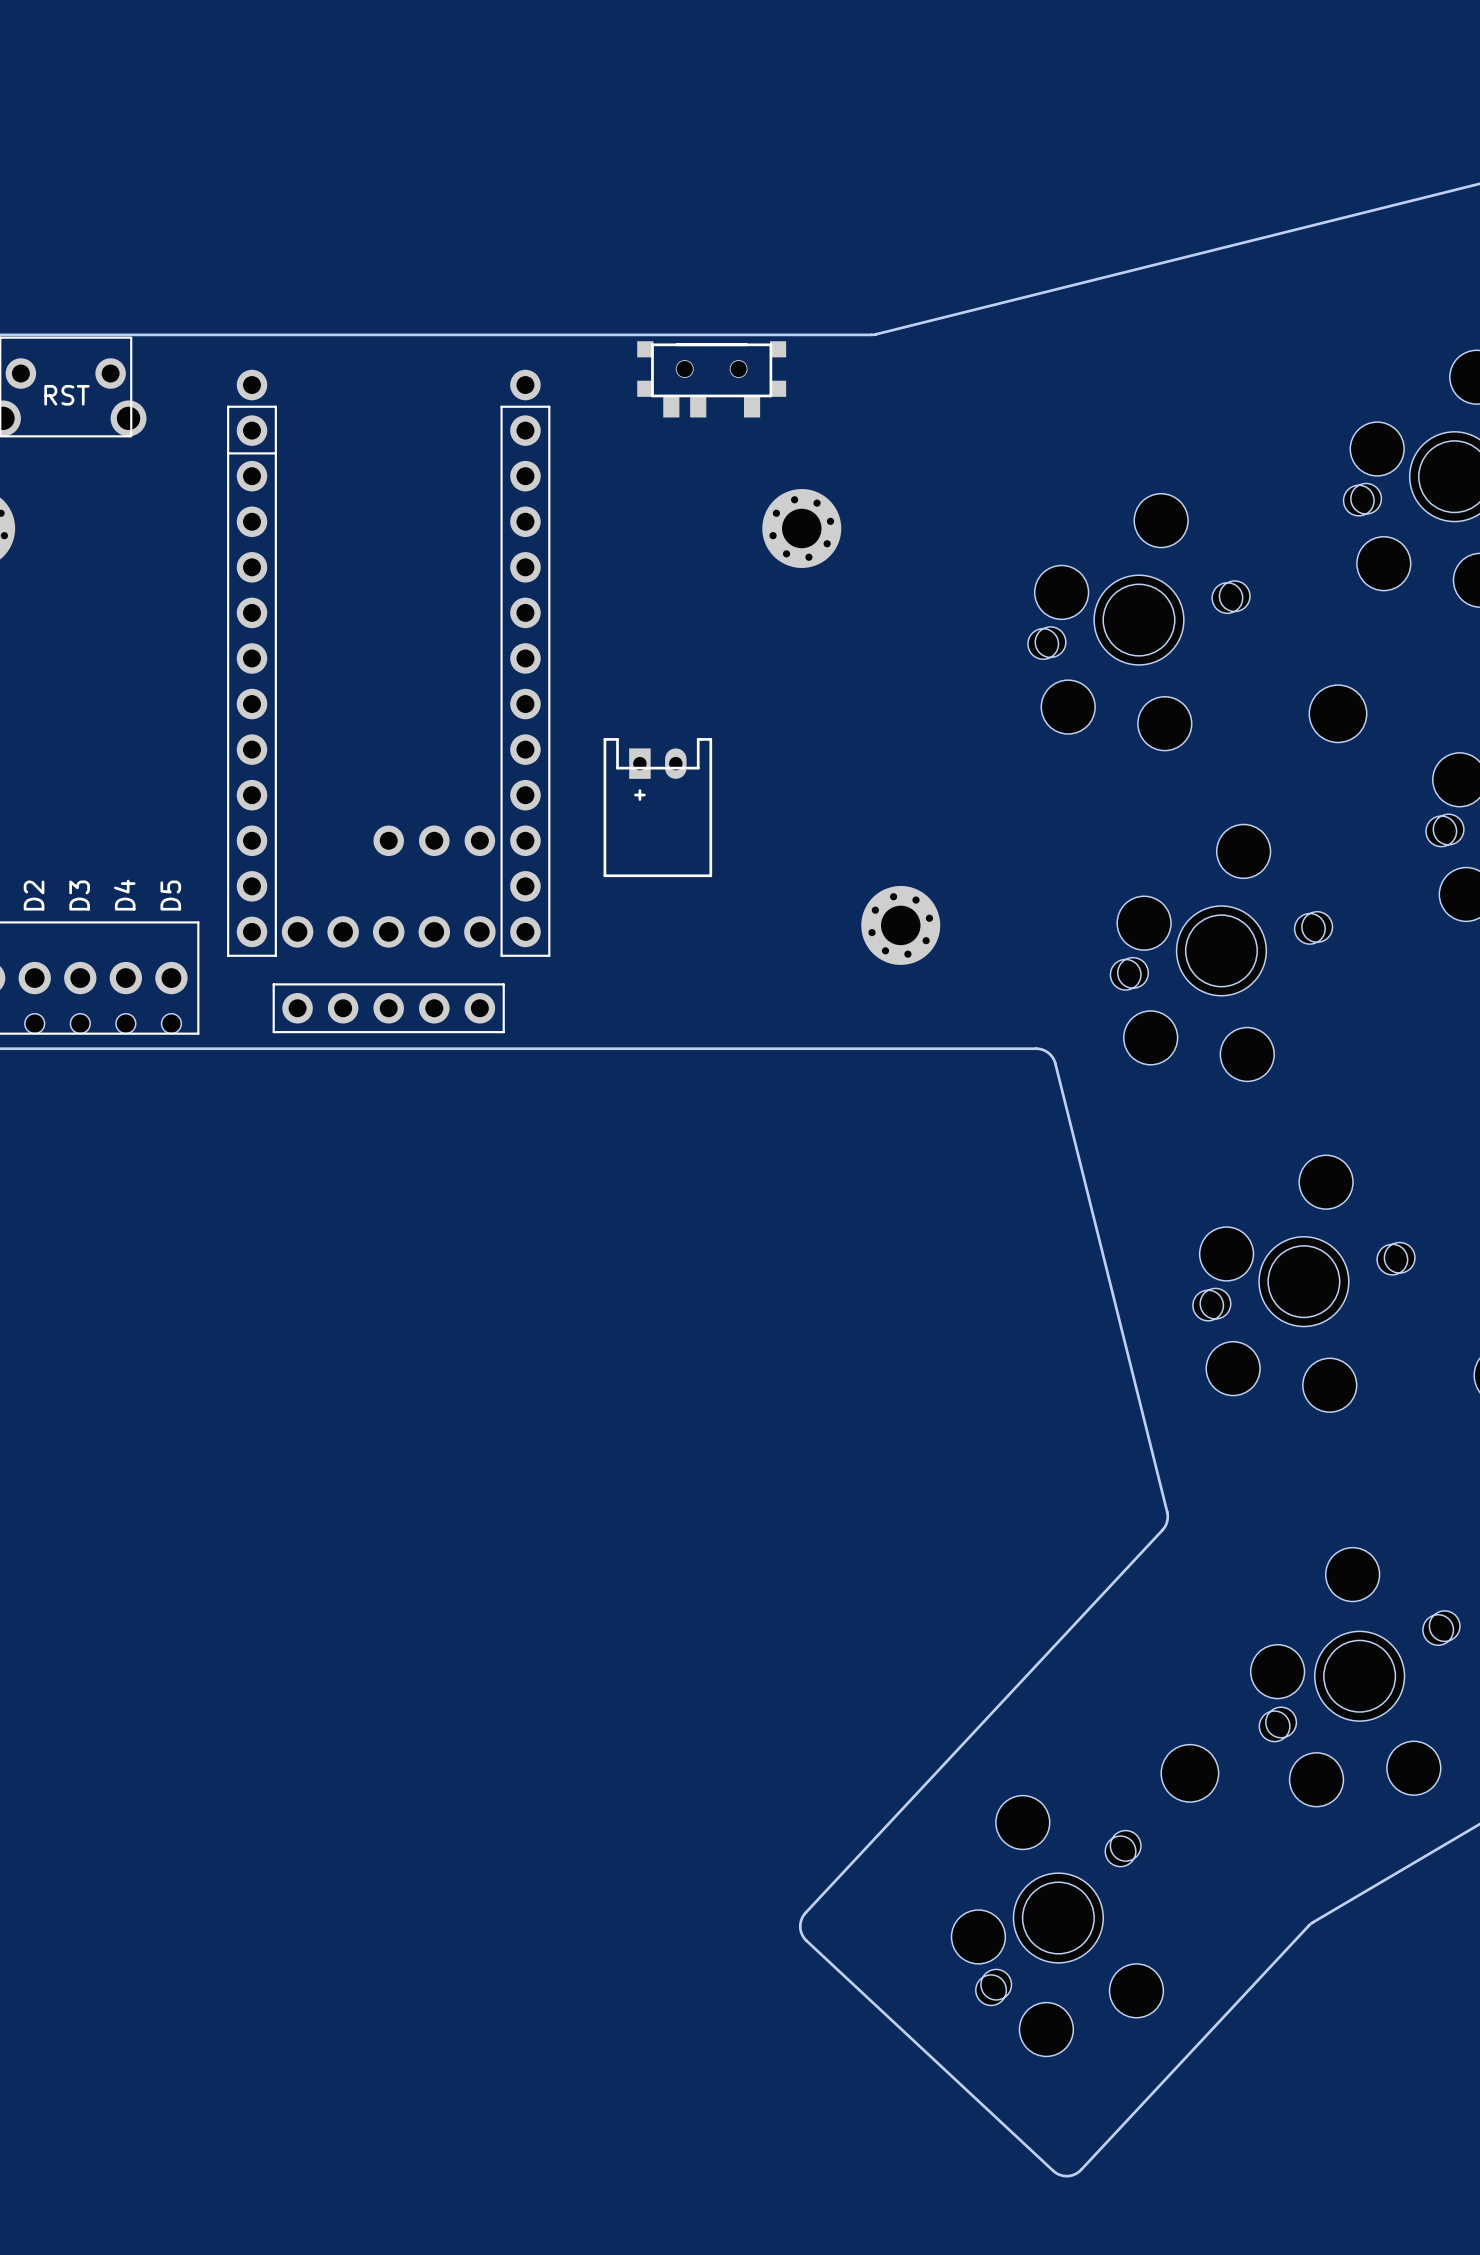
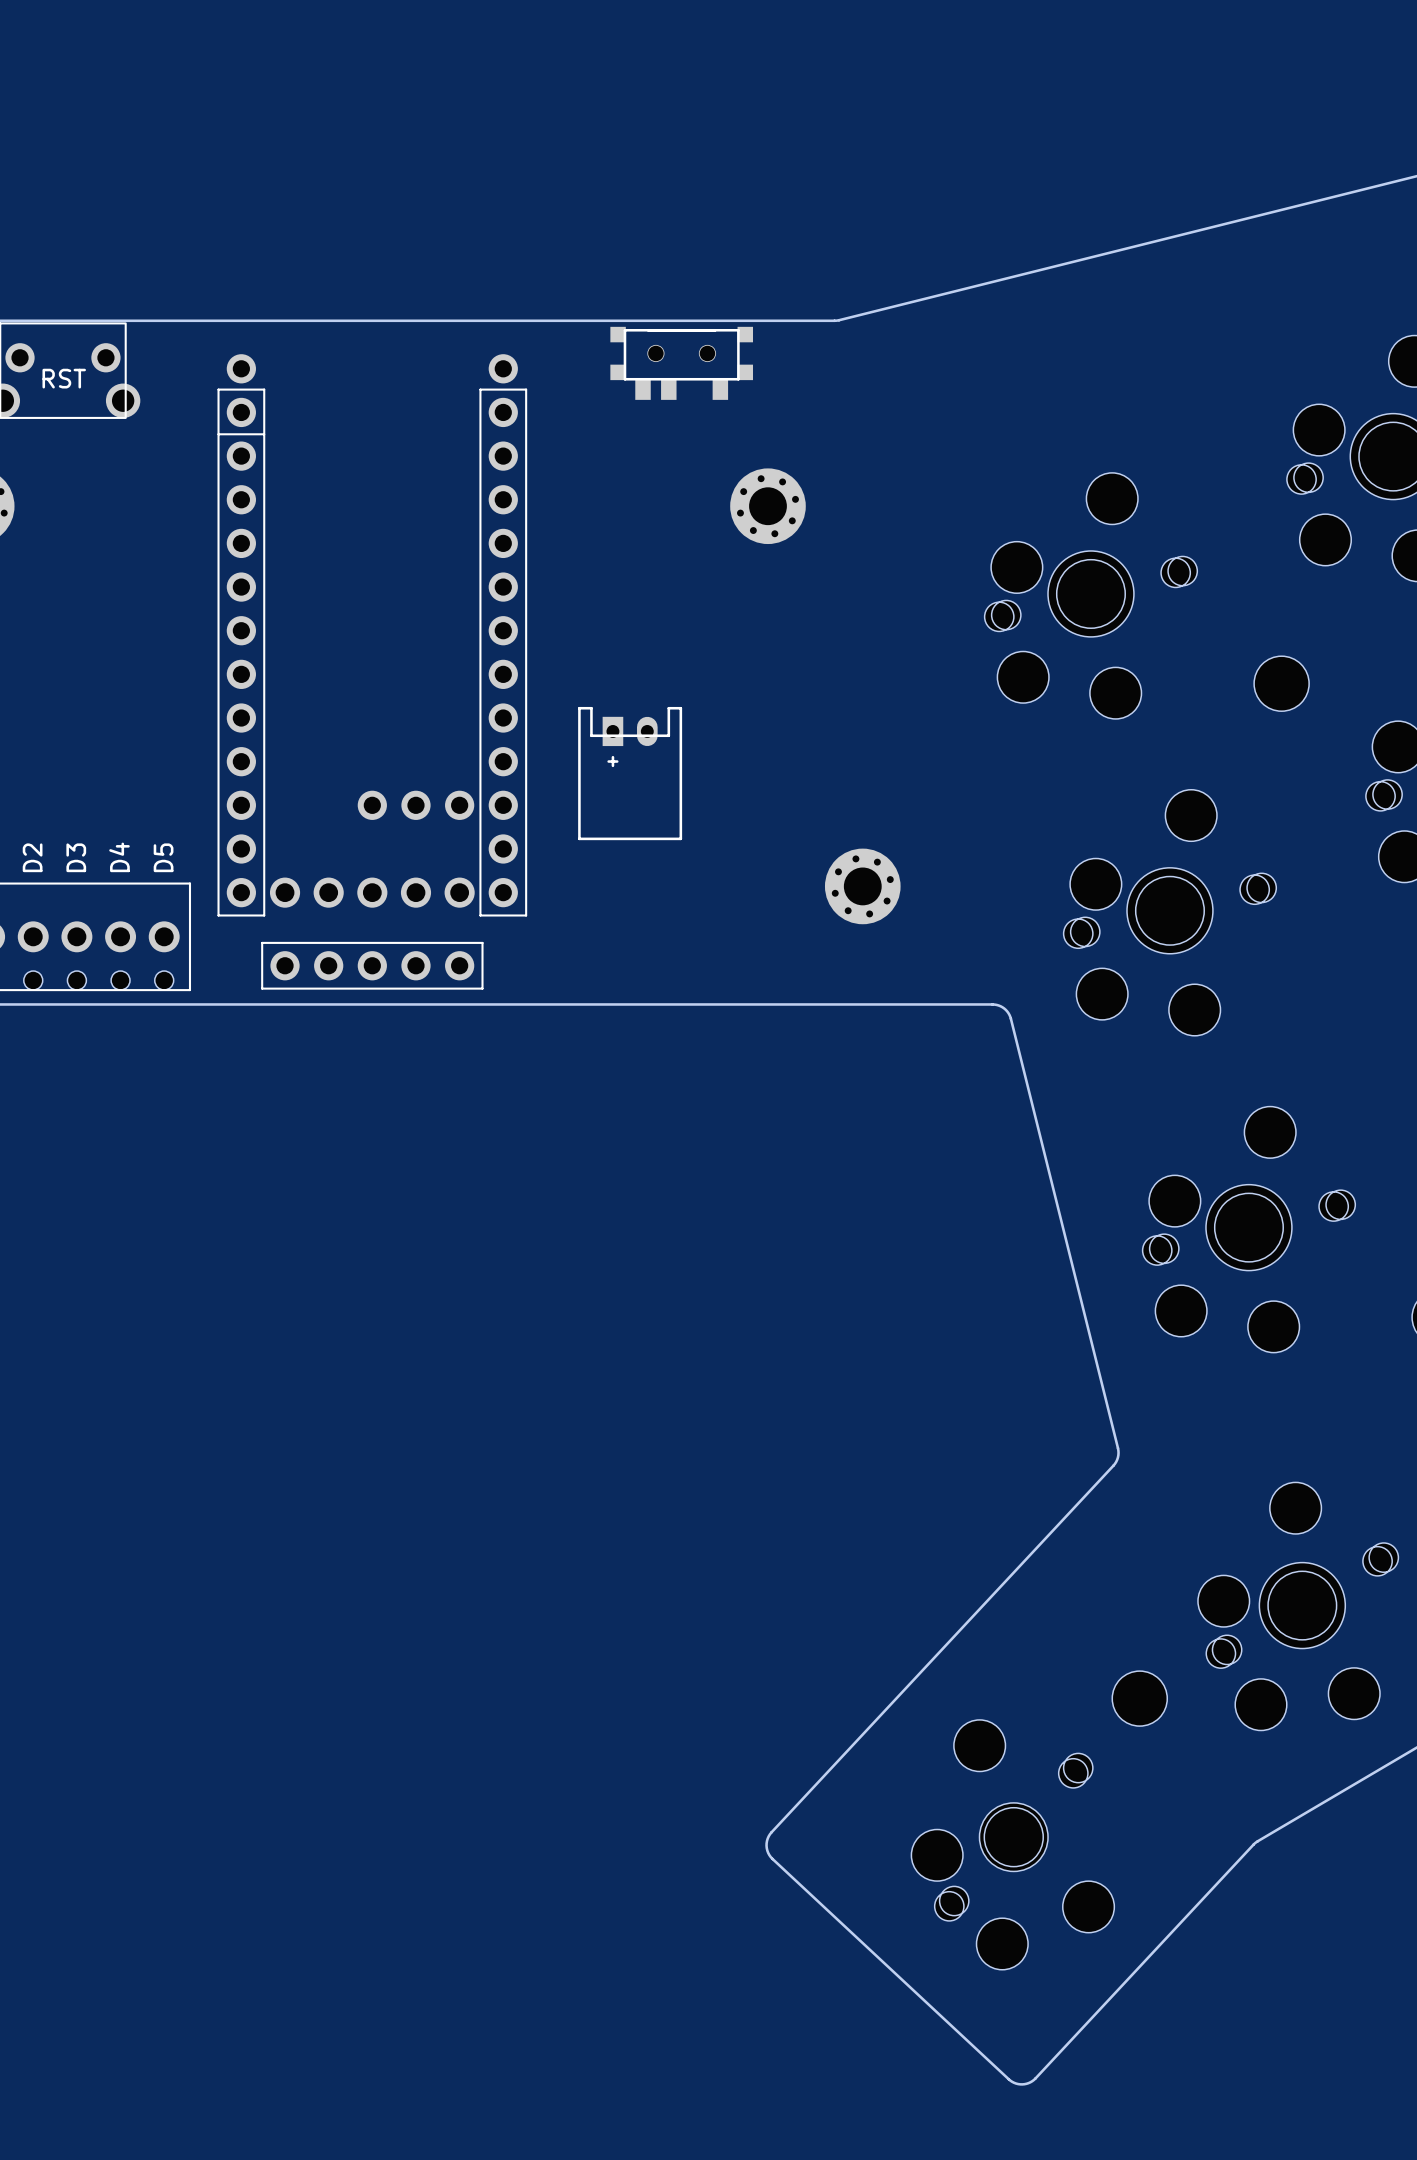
part footprint: [975, 1830, 1164, 2057] -> [934, 1753, 1115, 1970]

